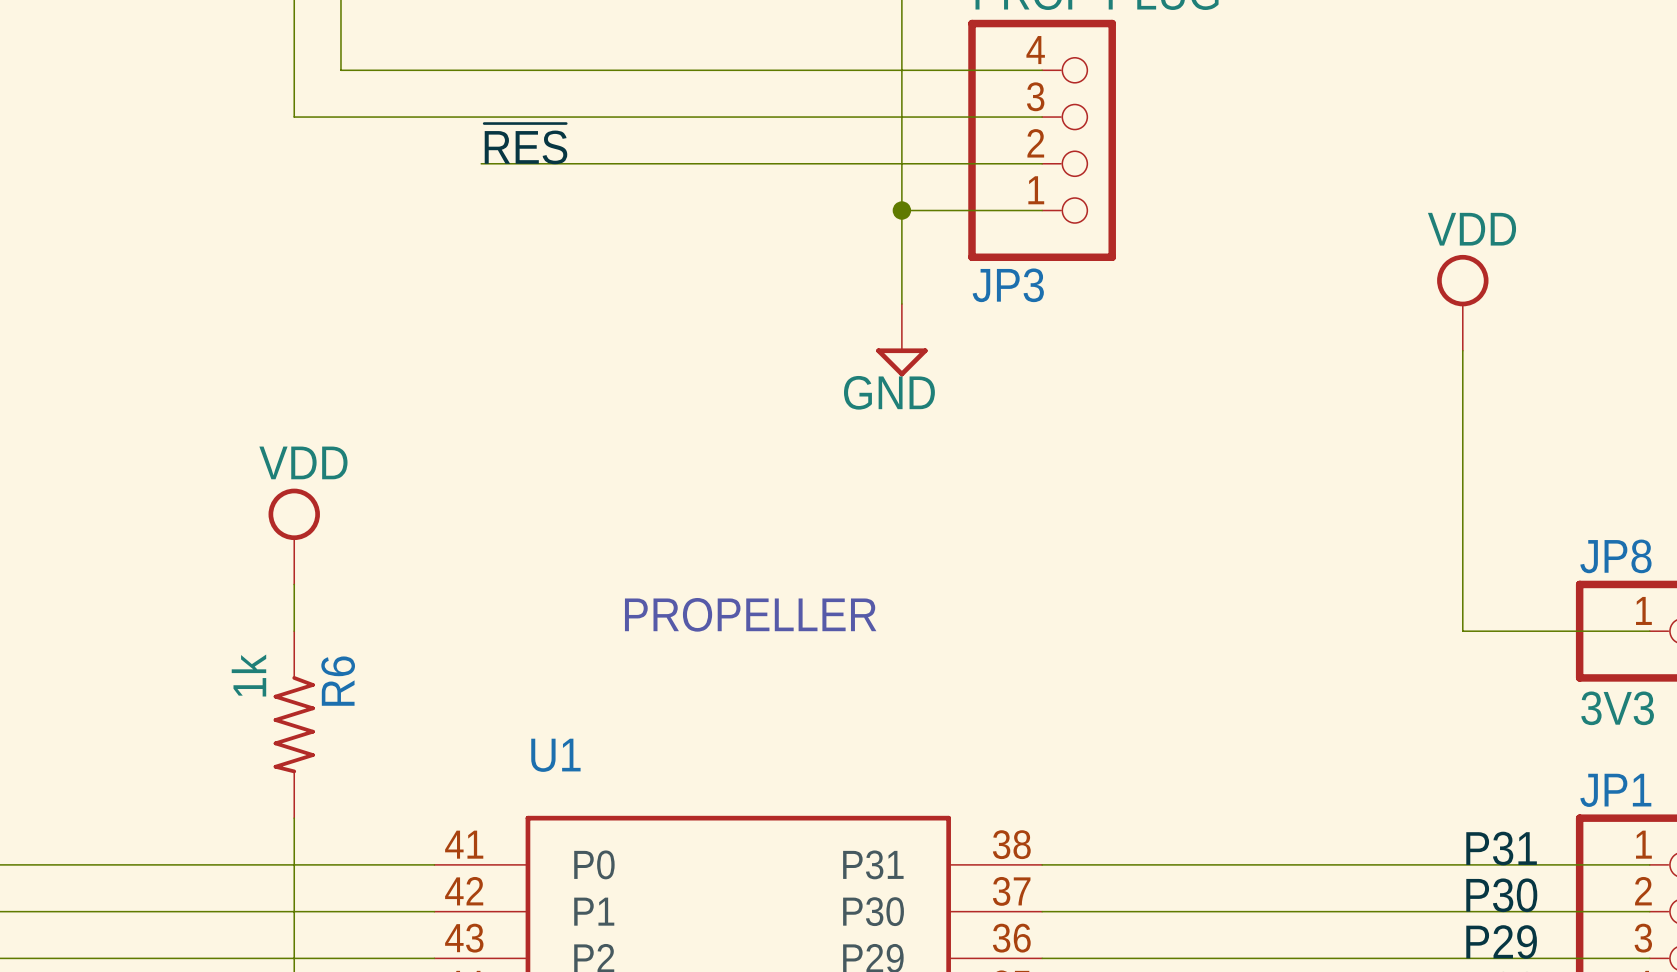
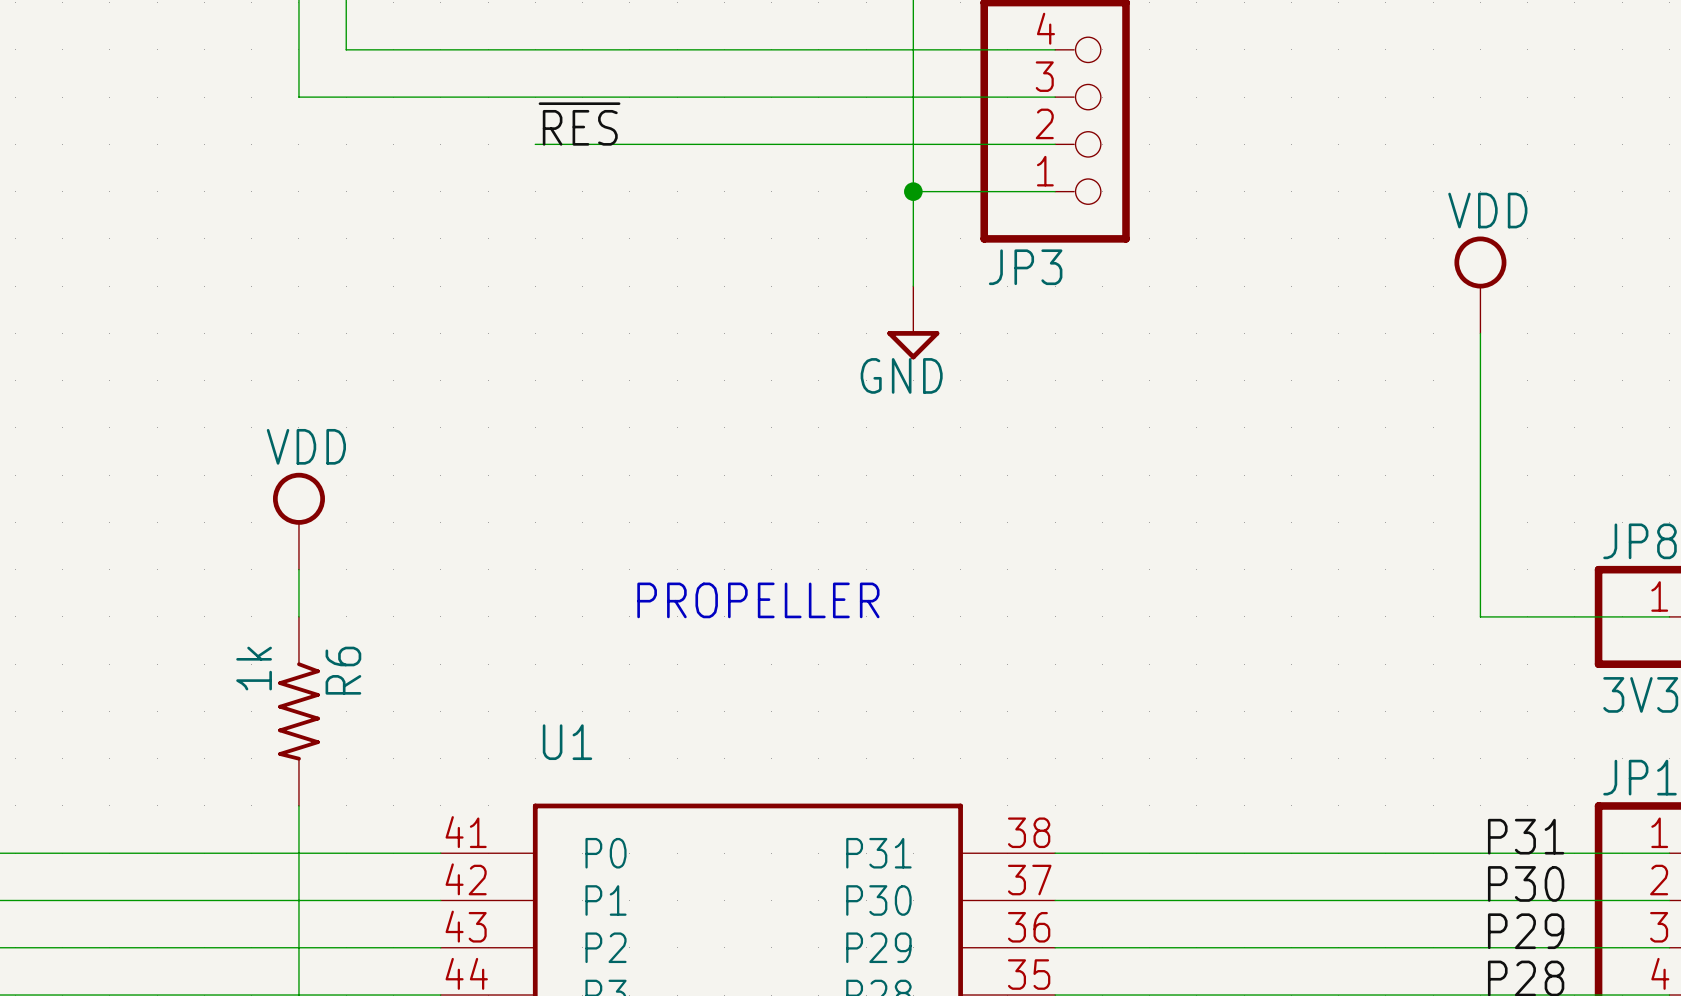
label position: ~{RES} (525, 143) -> ~{RES} (579, 124)
wire: (481, 163) (527, 163) -> none

